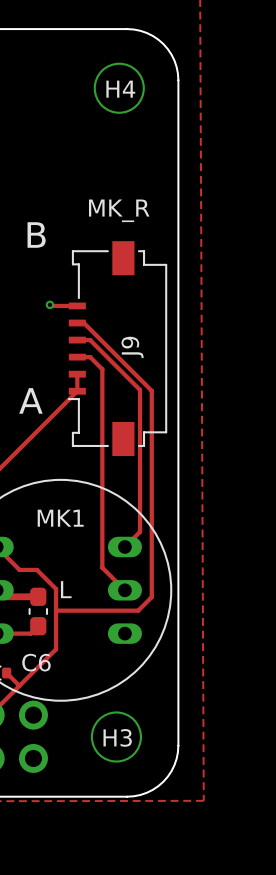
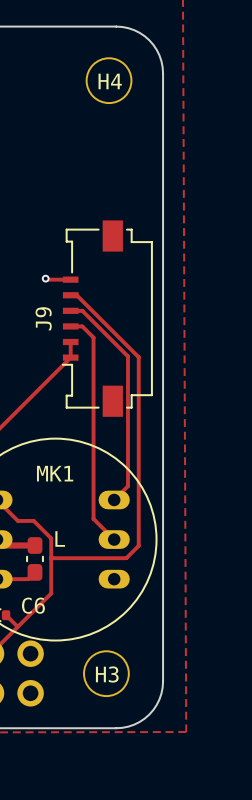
text: MK_R (119, 210) -> none
text: B (36, 235) -> none
J9 name position: J9 (132, 347) -> J9 (43, 318)
text: A (30, 400) -> none

